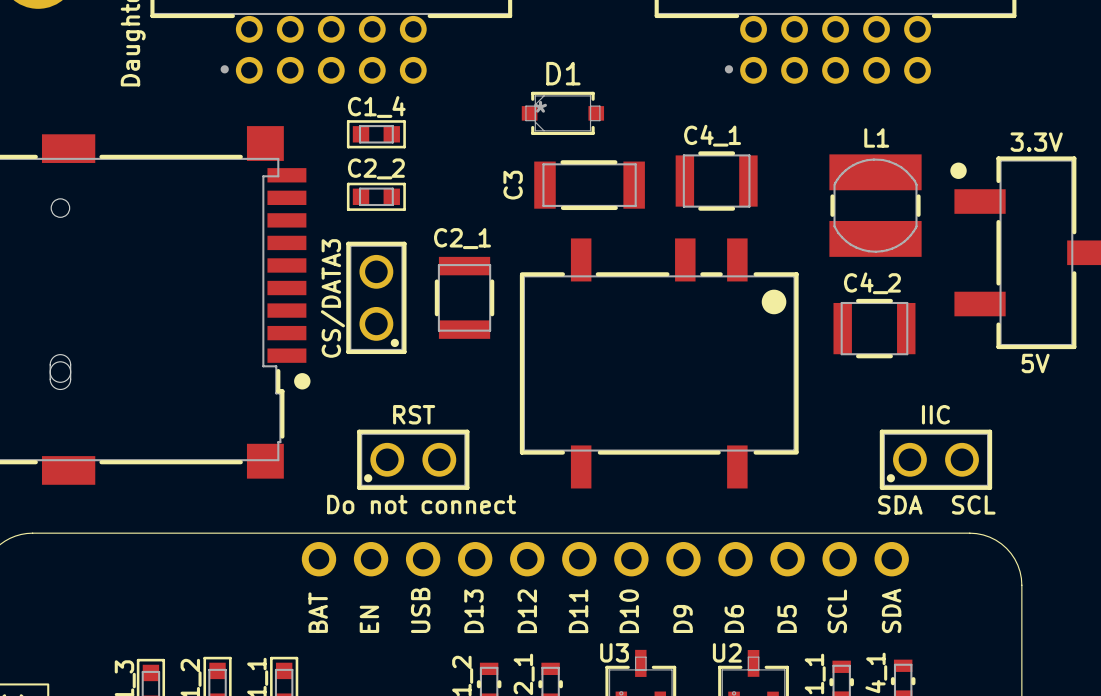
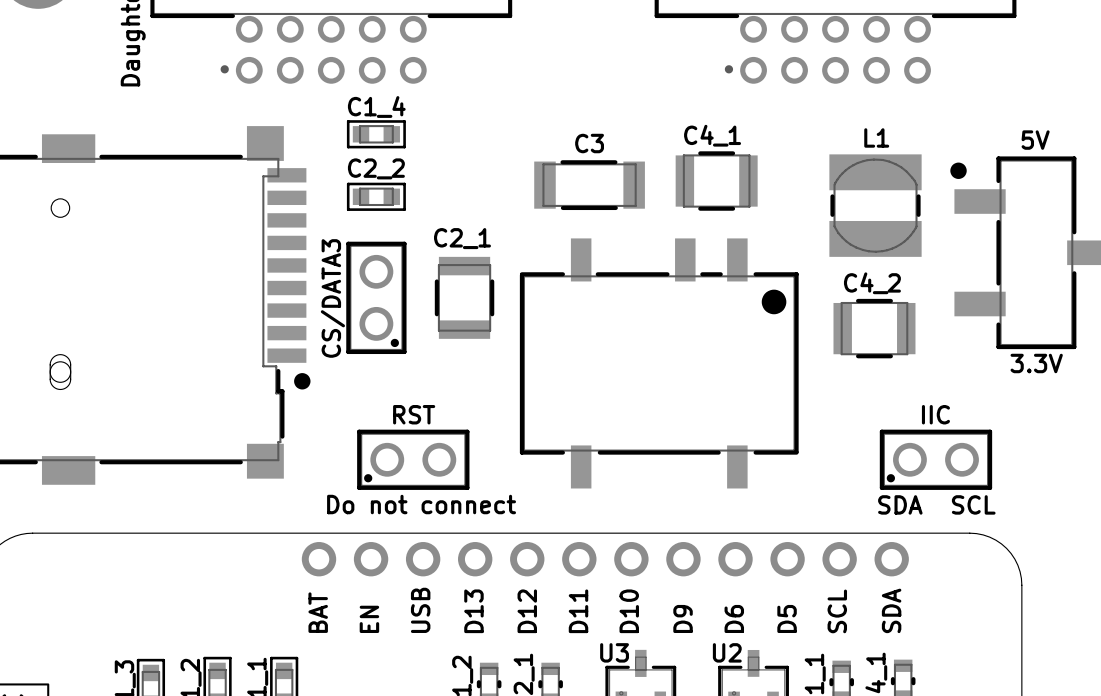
D1: (562, 113) -> none
text: 3.3V (1036, 142) -> 5V (1035, 140)
C3 name rotation: 0° (513, 185) -> 90° clockwise (589, 143)
C3 name position: C3 (513, 185) -> C3 (589, 143)
text: 5V (1035, 363) -> 3.3V (1036, 363)

